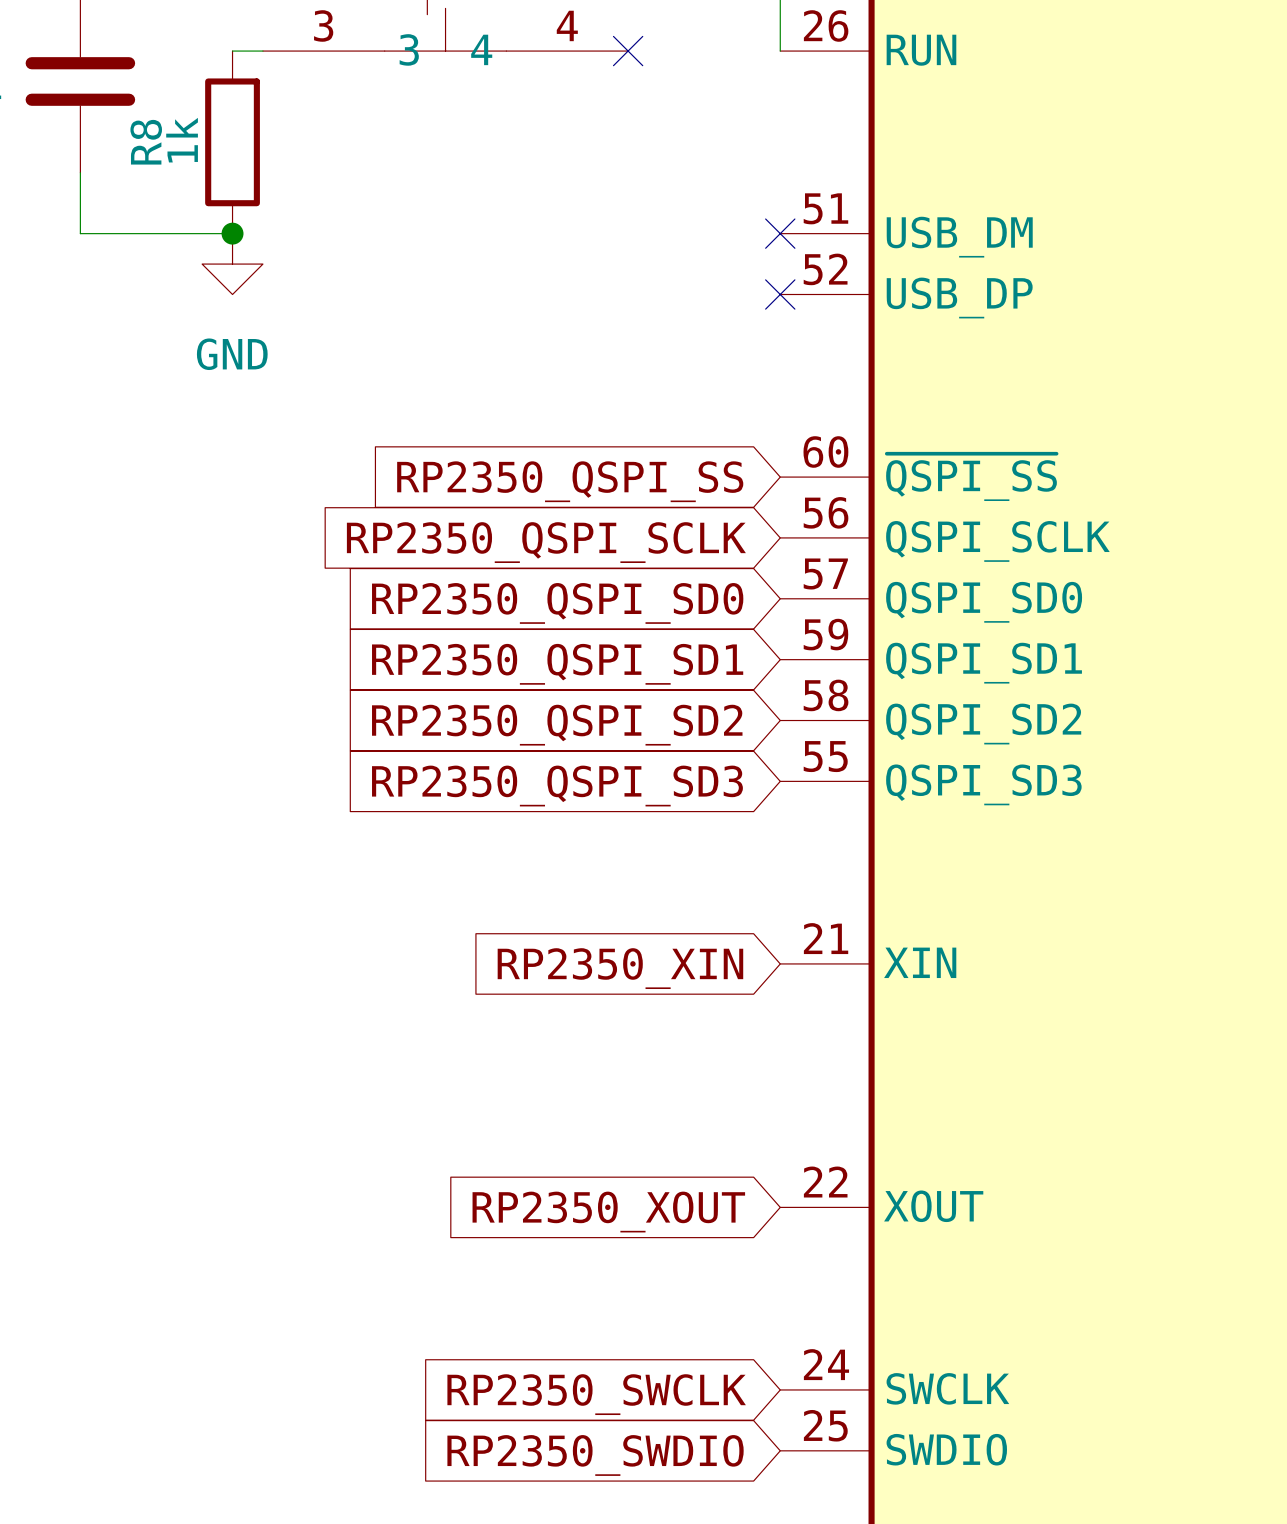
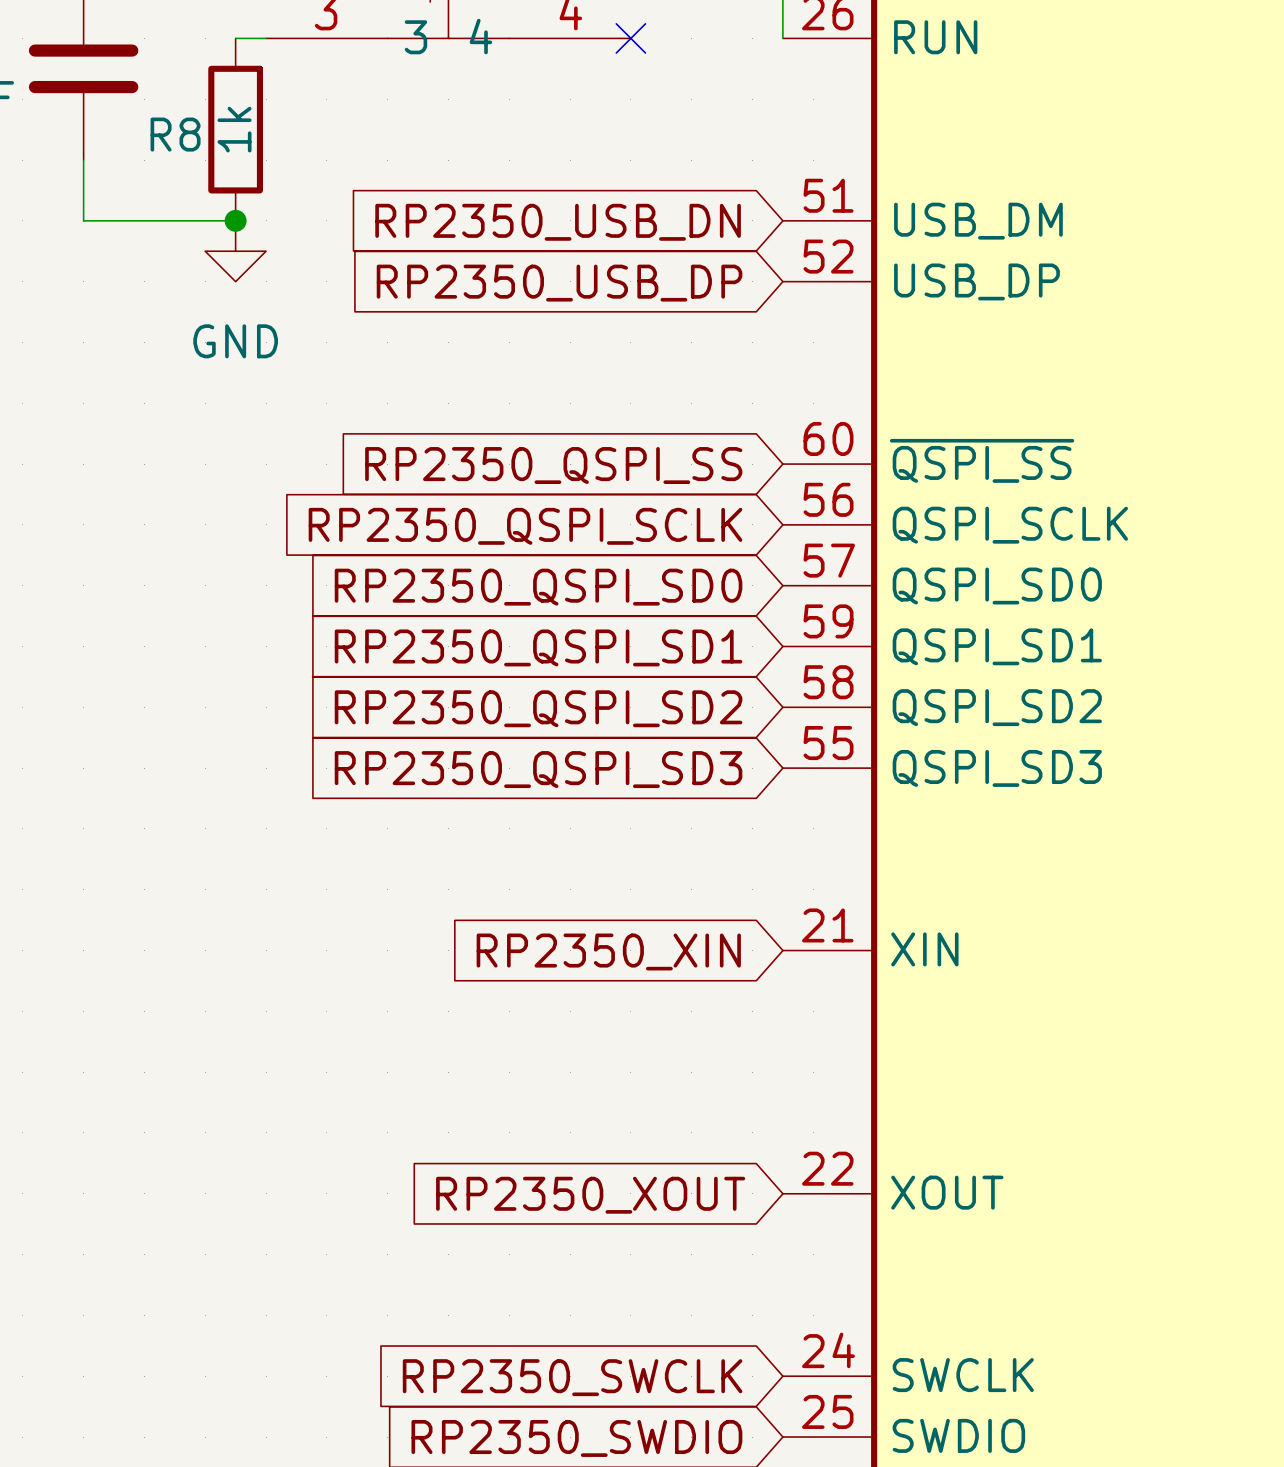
R8 value position: 1k (182, 140) -> 1k (234, 129)
R8 name rotation: 0° (146, 142) -> 90° clockwise (175, 134)
no-connect mark: (780, 233) -> none
global label: none -> RP2350_USB_DN (558, 222)
no-connect mark: (780, 294) -> none
global label: none -> RP2350_USB_DP (559, 283)

